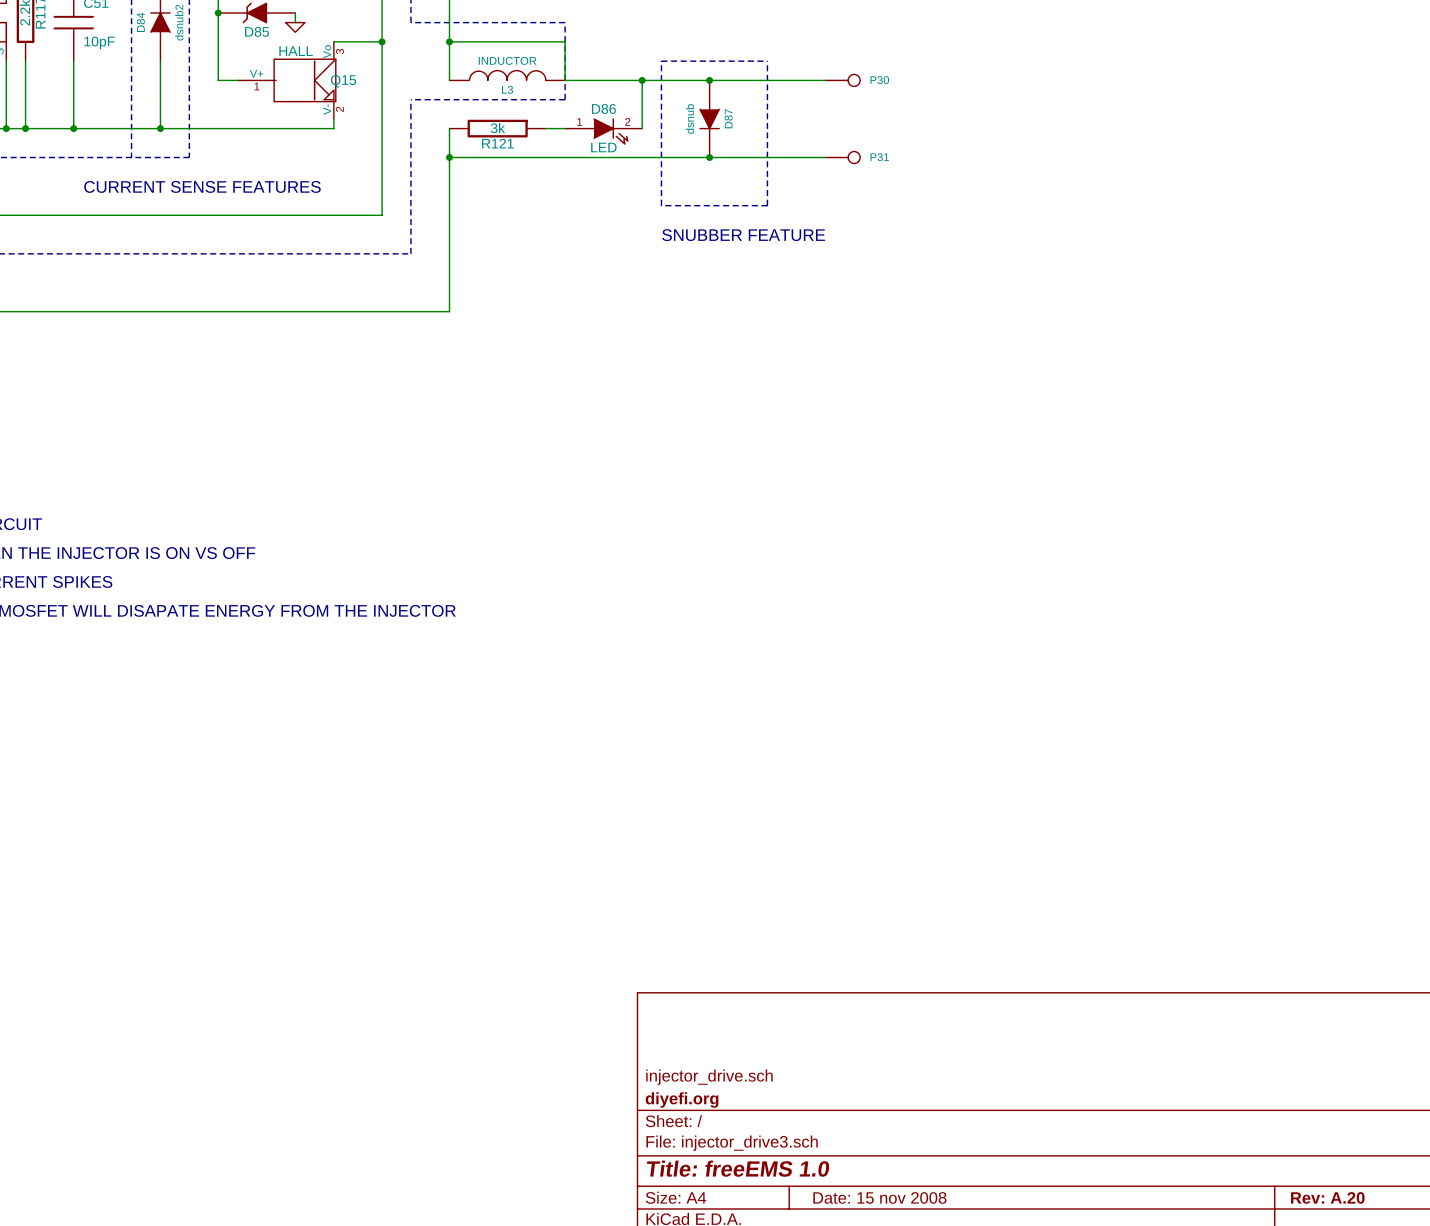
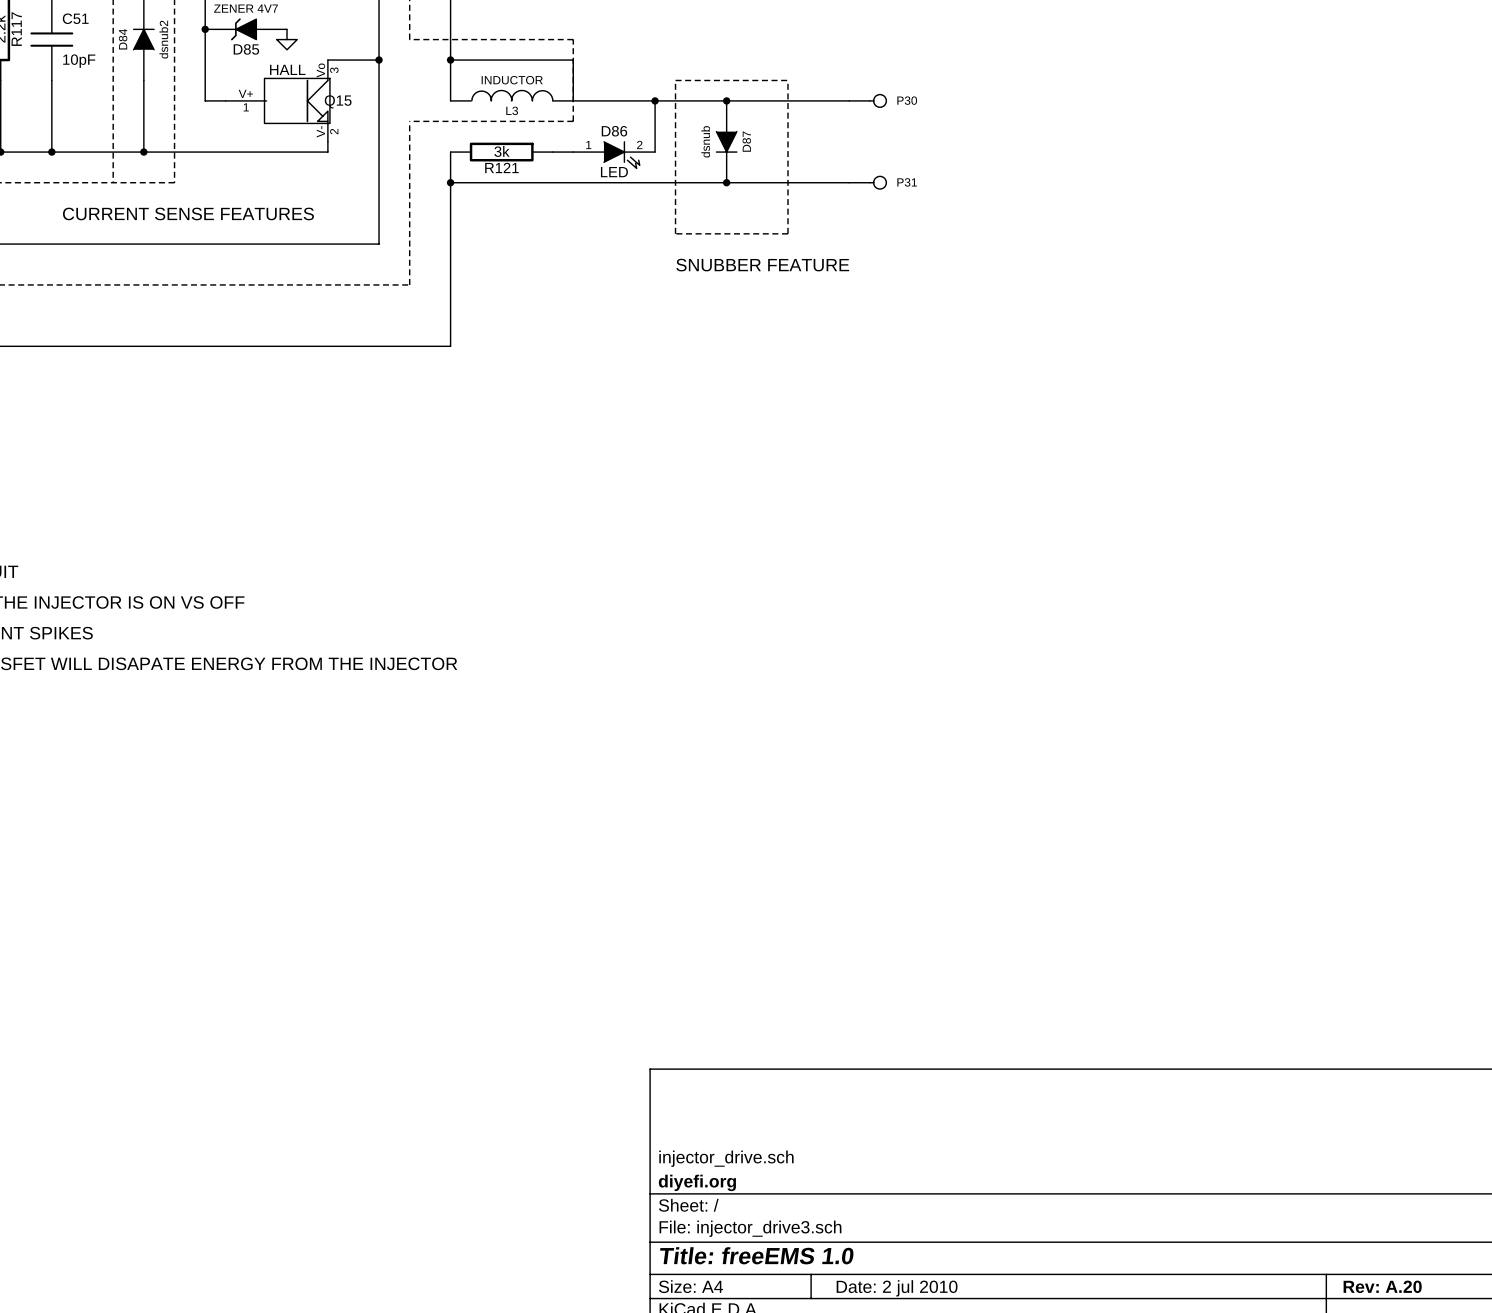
title block: Date: 15 nov 2008 (879, 1197) -> Date: 2 jul 2010 (897, 1288)

